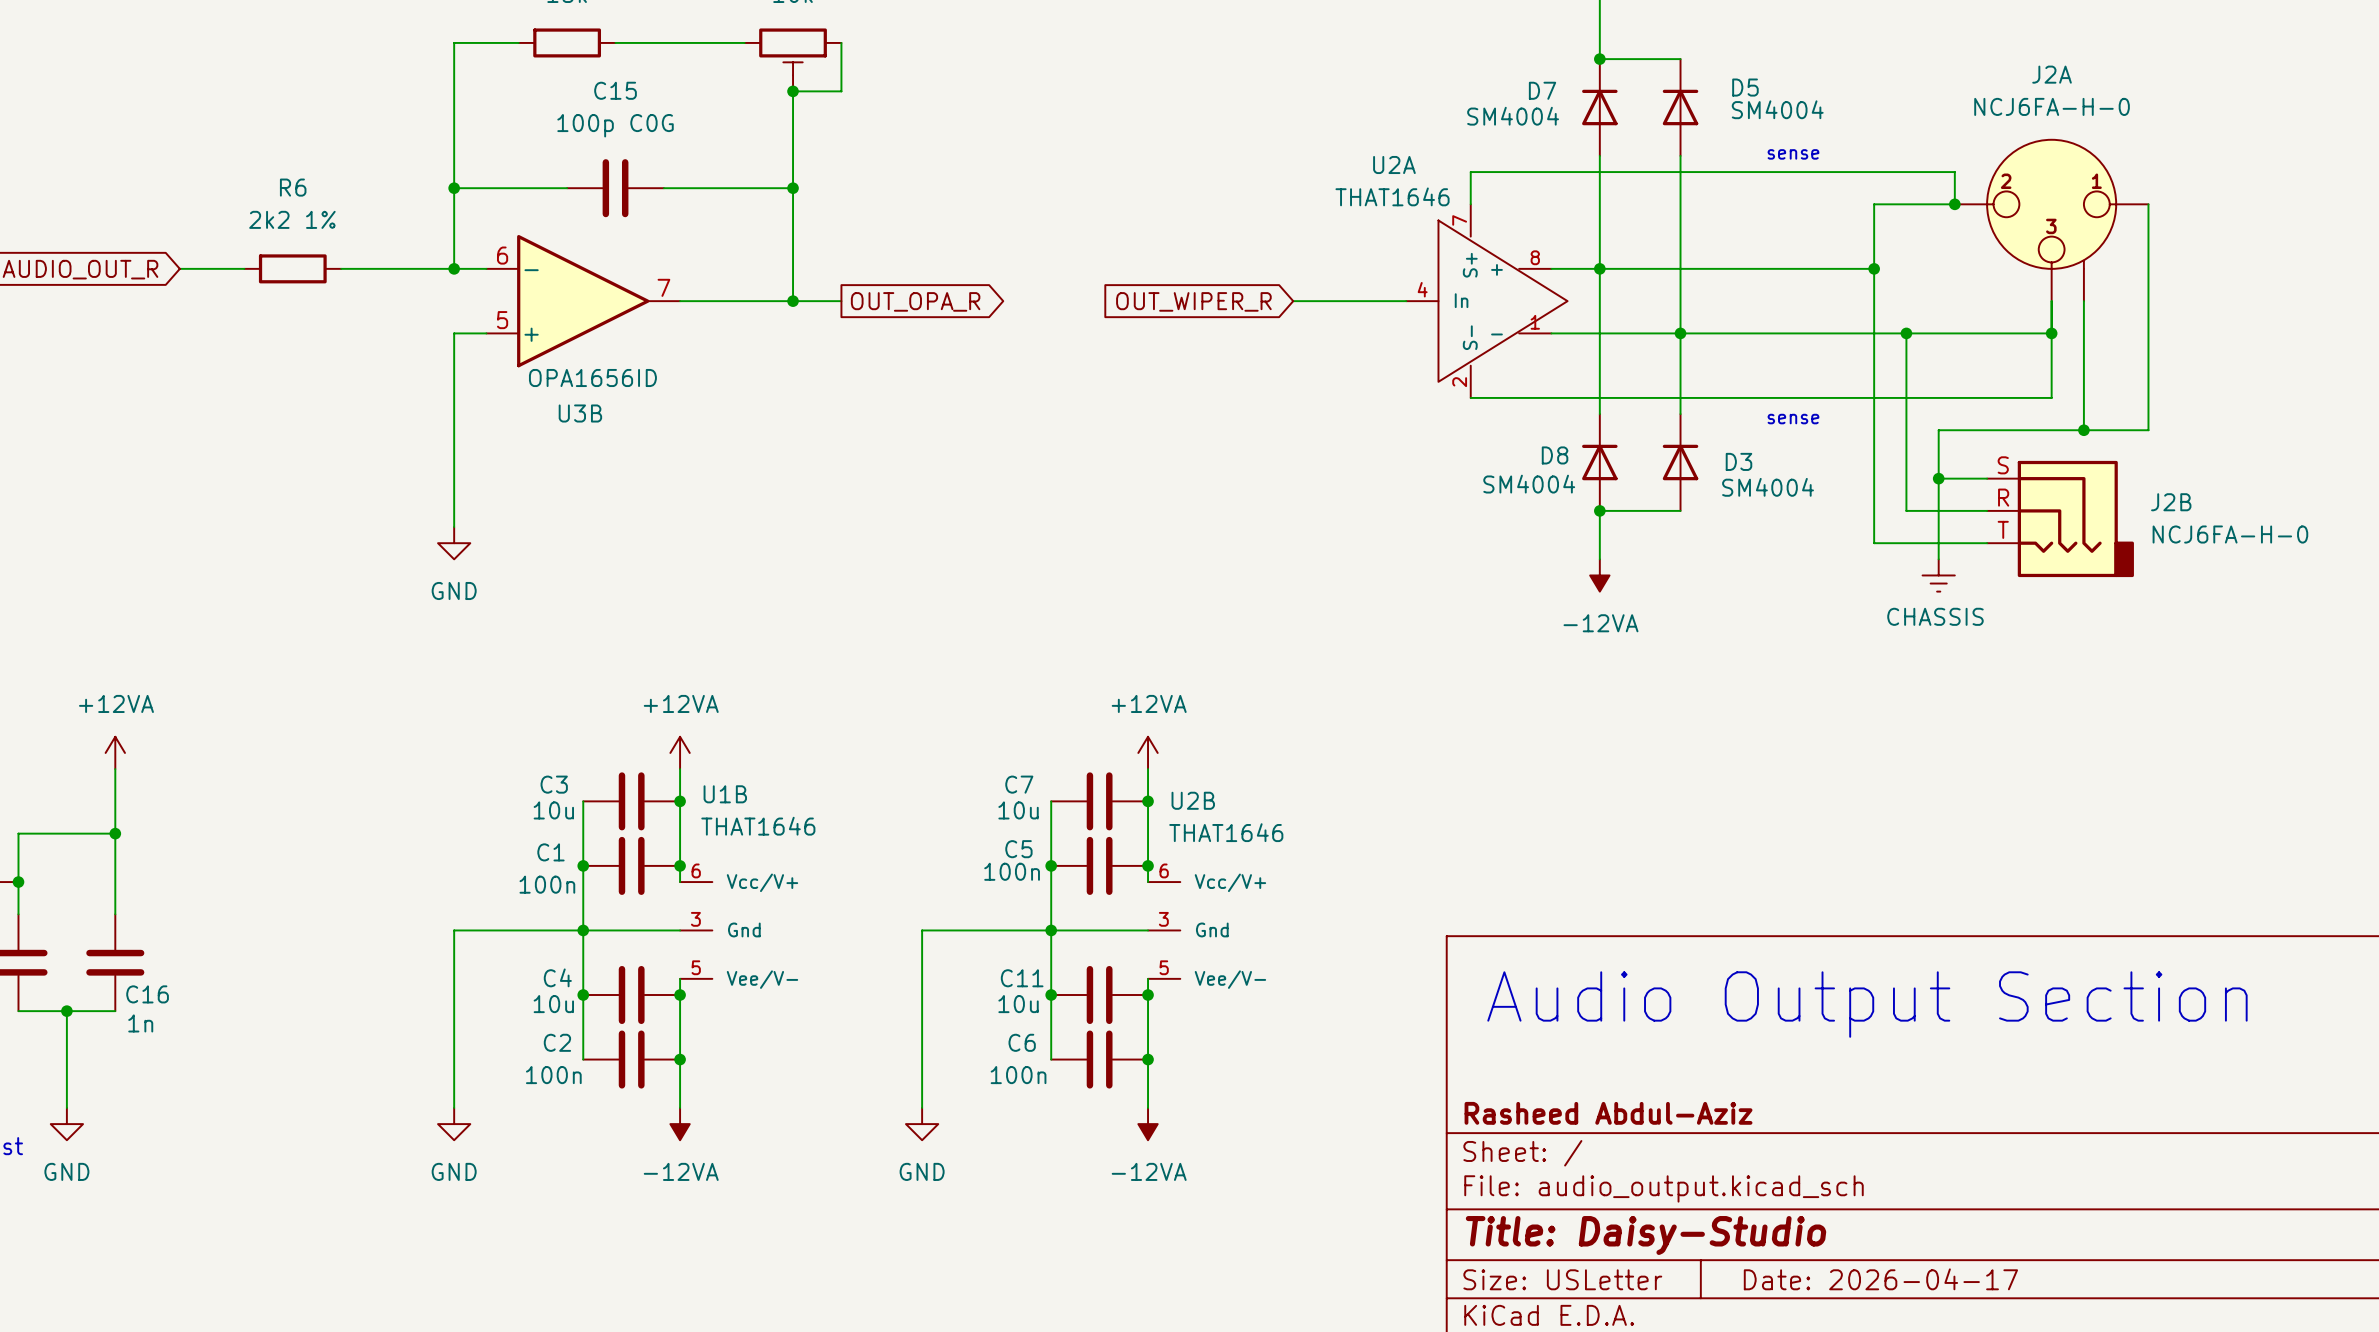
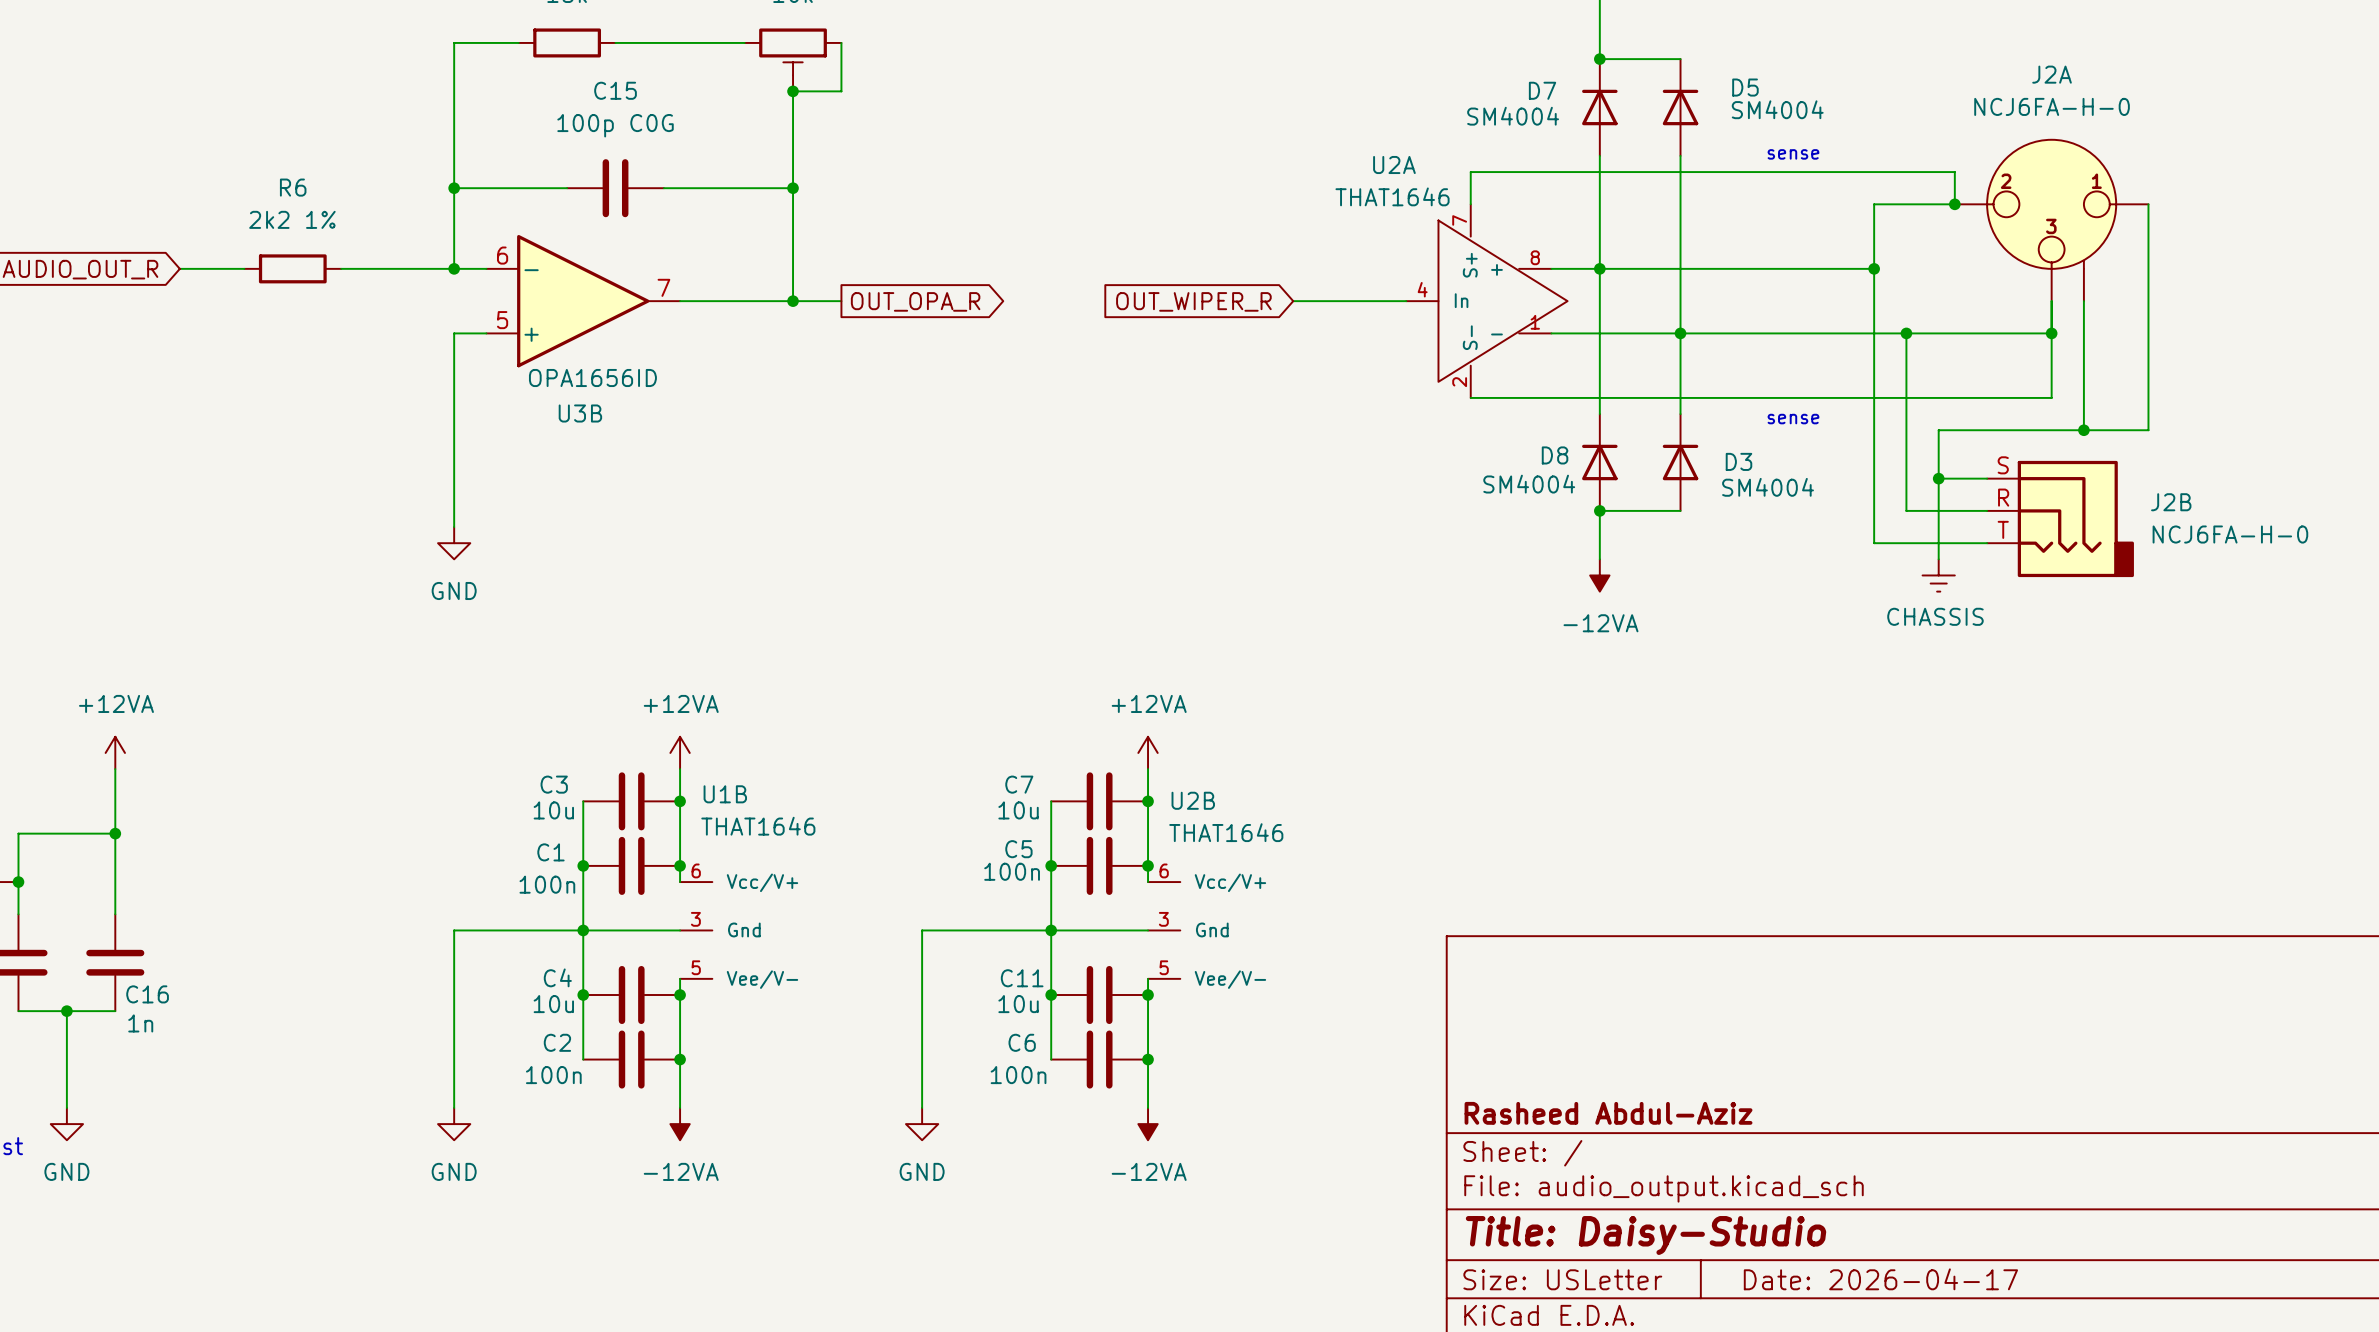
text: Audio Output Section (1867, 1004) -> none

